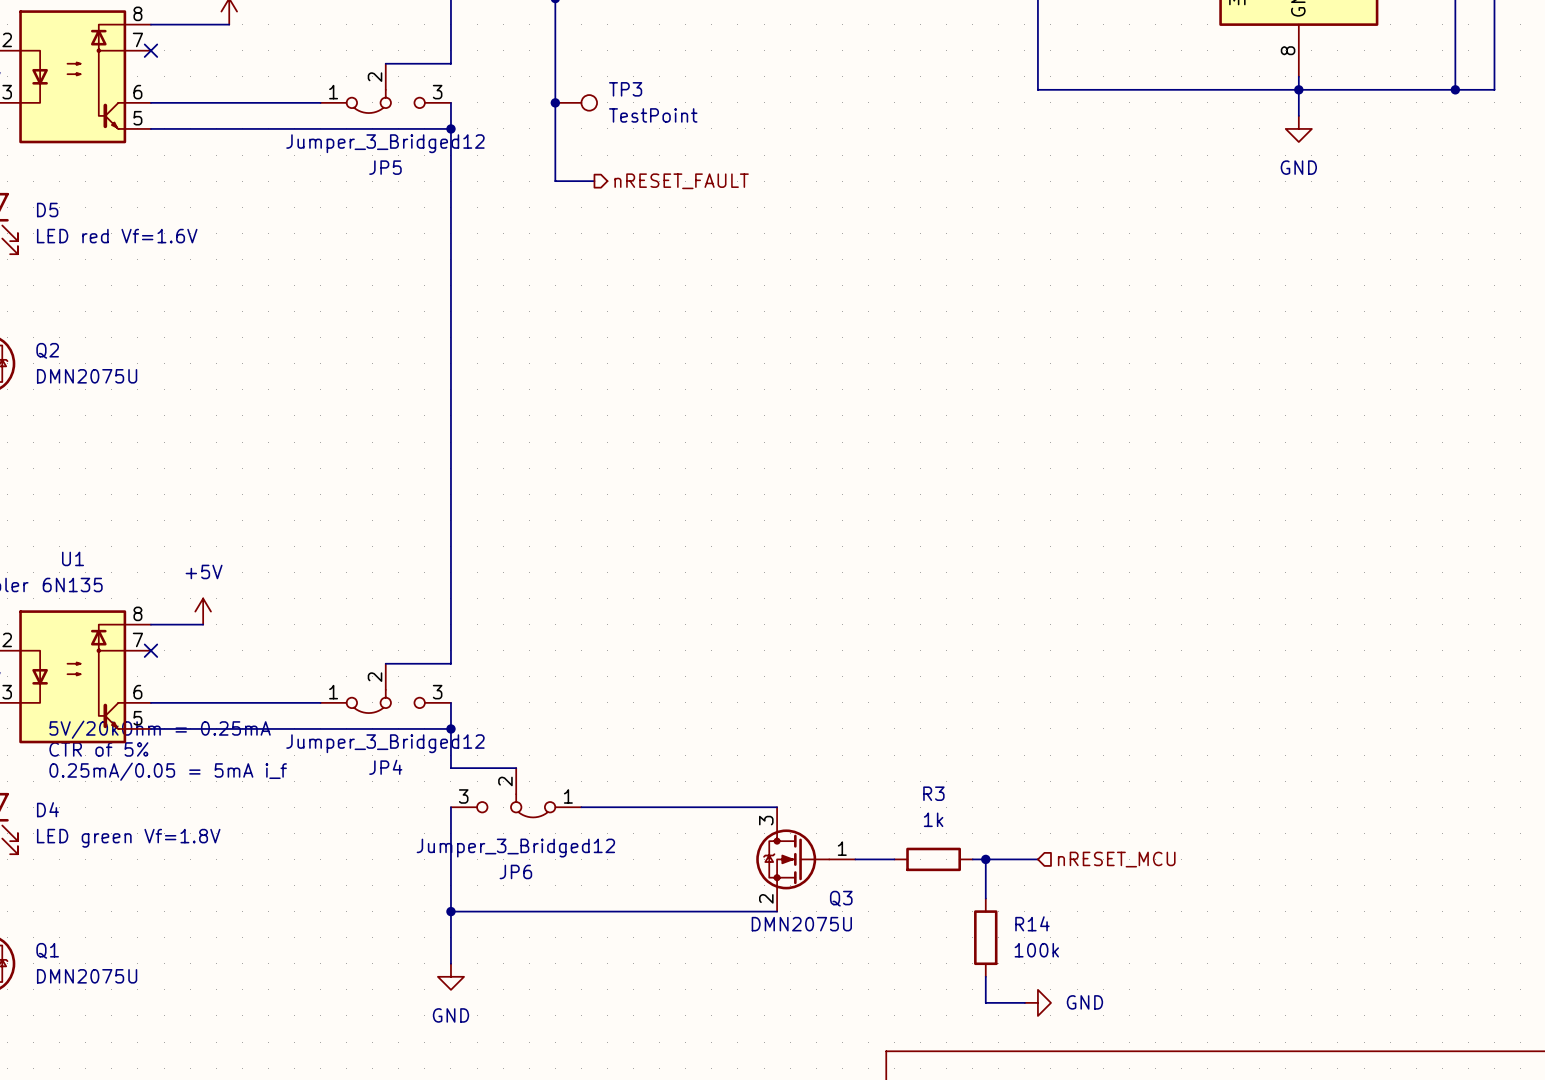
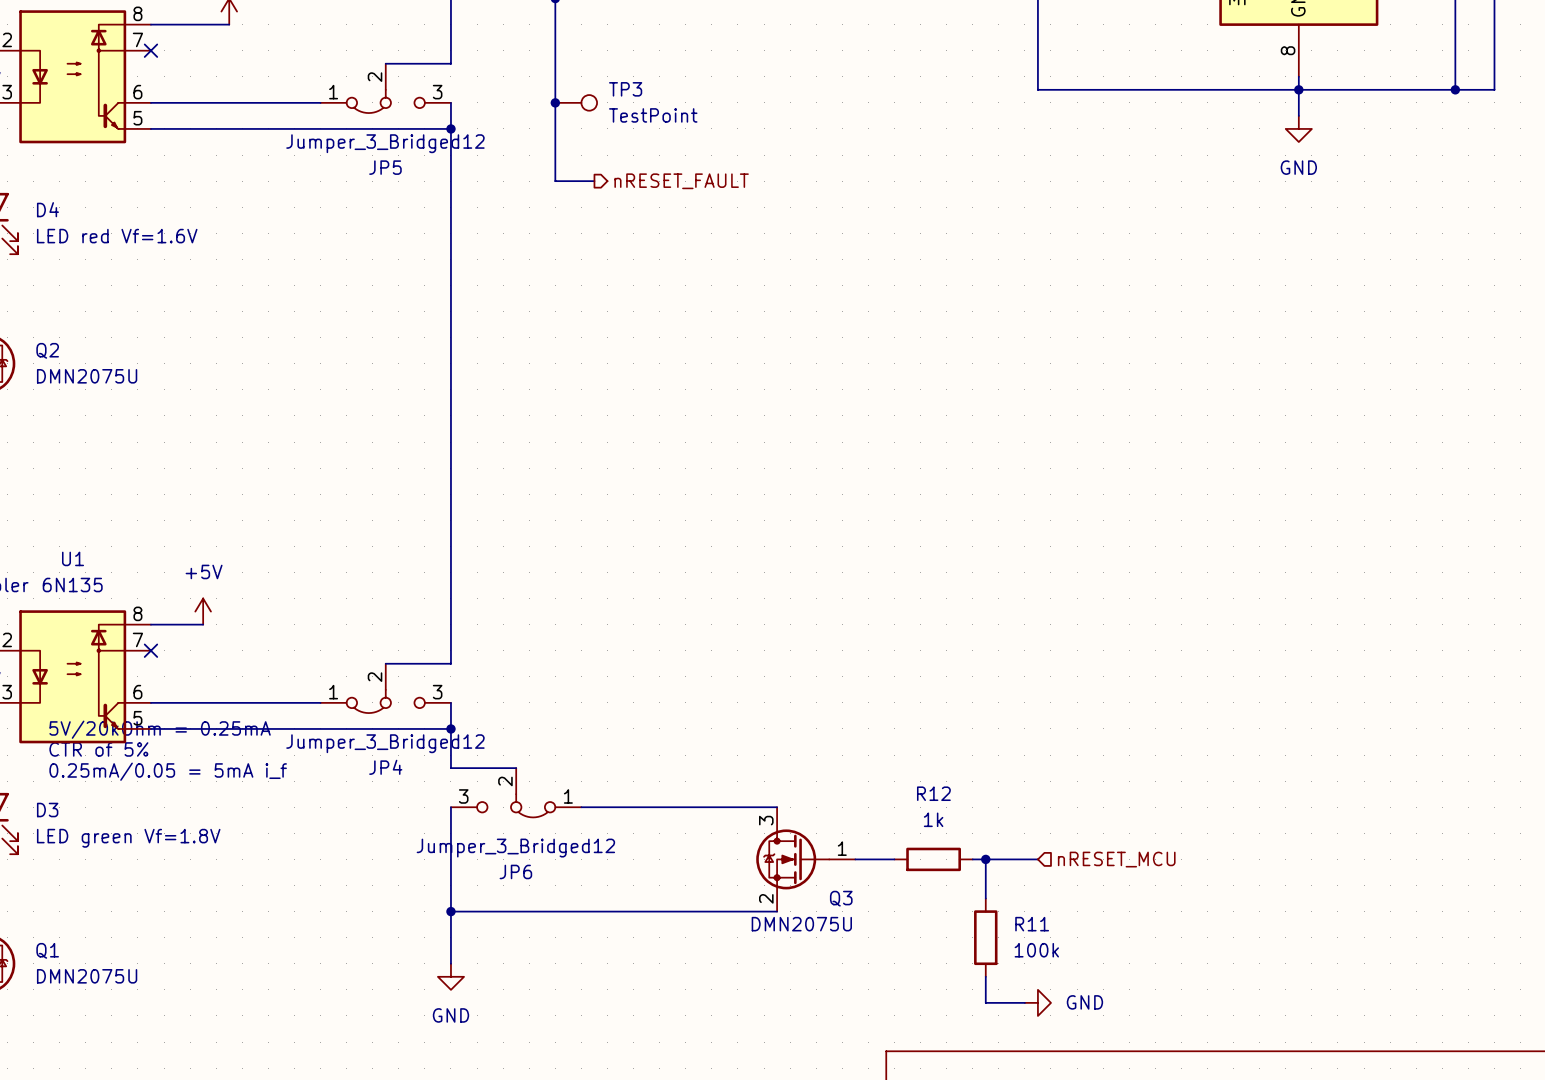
D5 name: D5 (47, 210) -> D4 (47, 209)
R3 name: R3 (933, 793) -> R12 (933, 793)
D4 name: D4 (47, 809) -> D3 (47, 810)
R14 name: R14 (1032, 923) -> R11 (1032, 924)

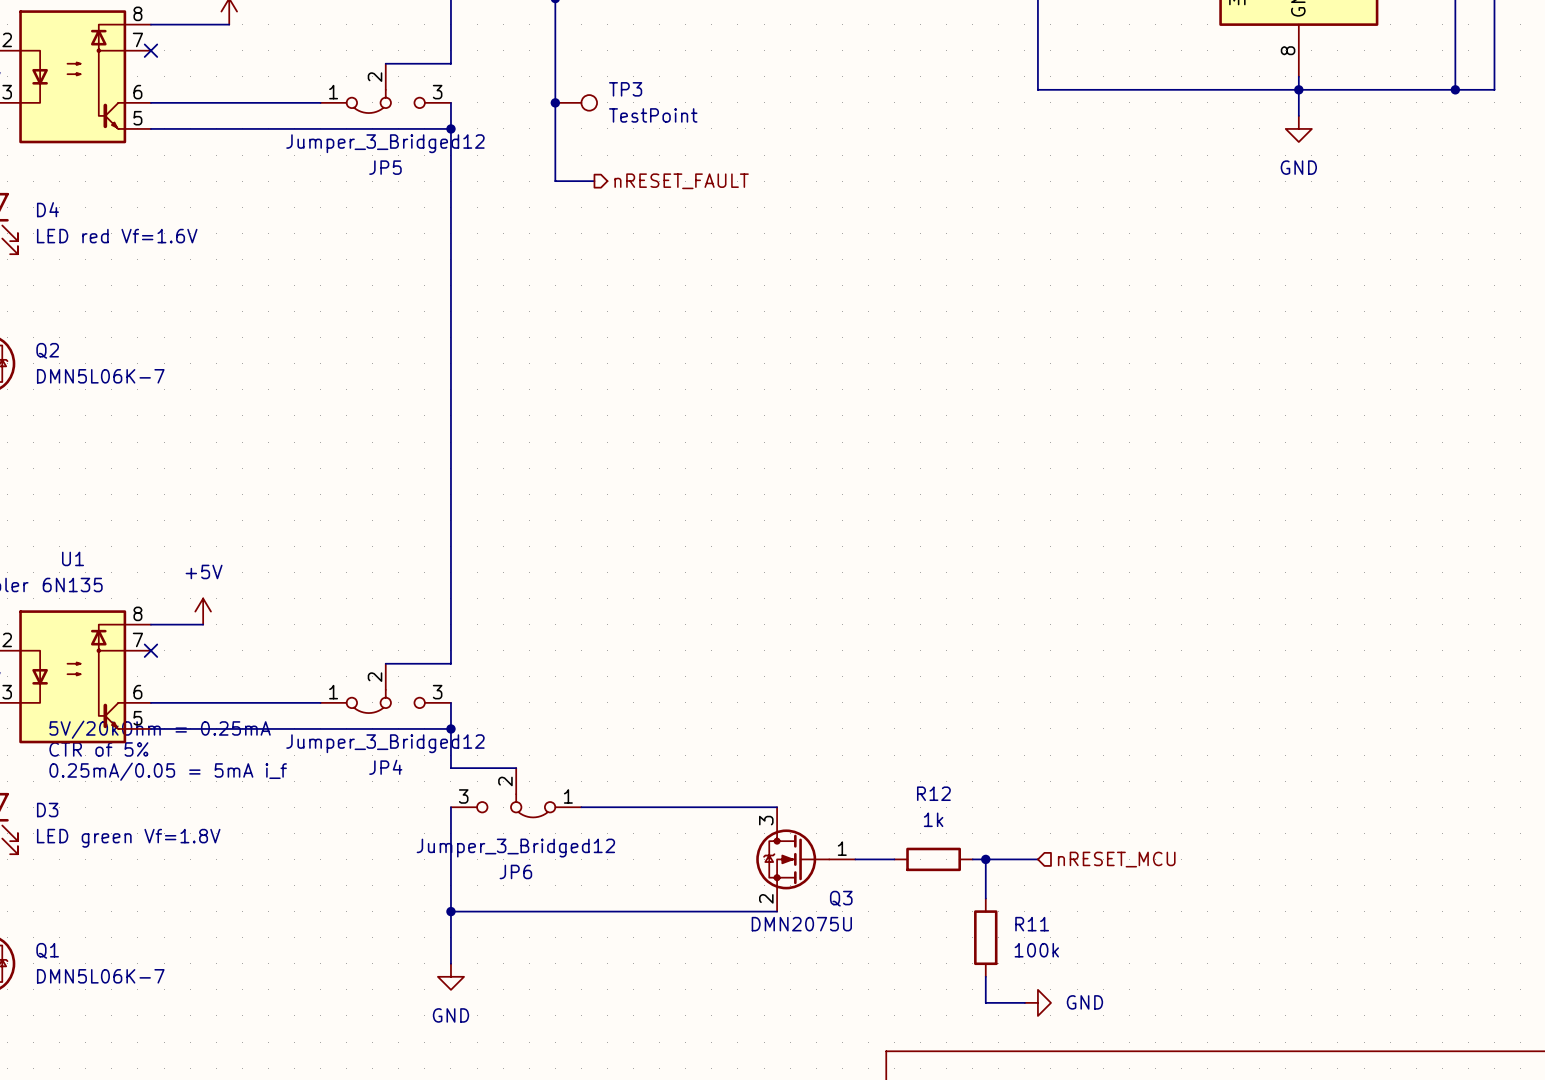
Q2 value: DMN2075U (87, 376) -> DMN5L06K-7 (100, 376)
Q1 value: DMN2075U (87, 976) -> DMN5L06K-7 (100, 976)

